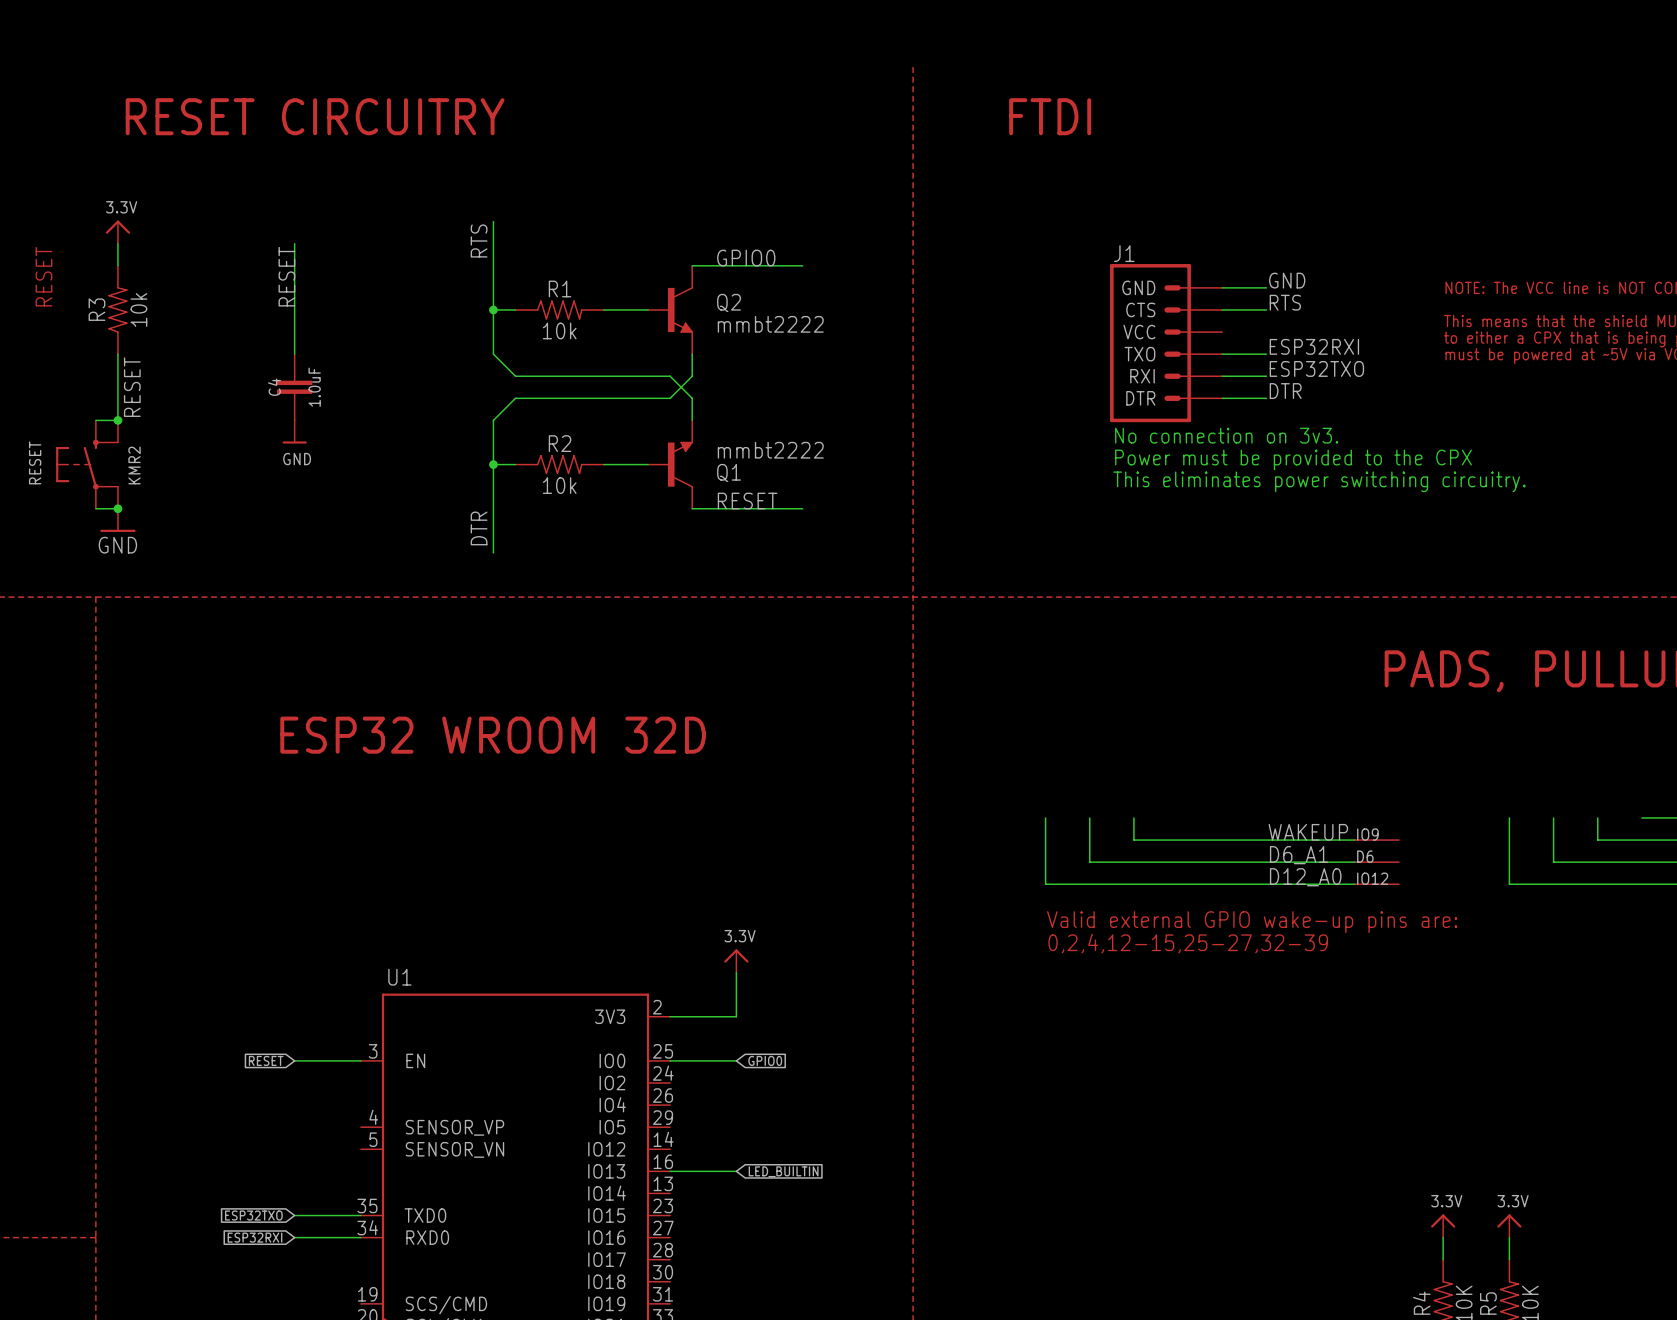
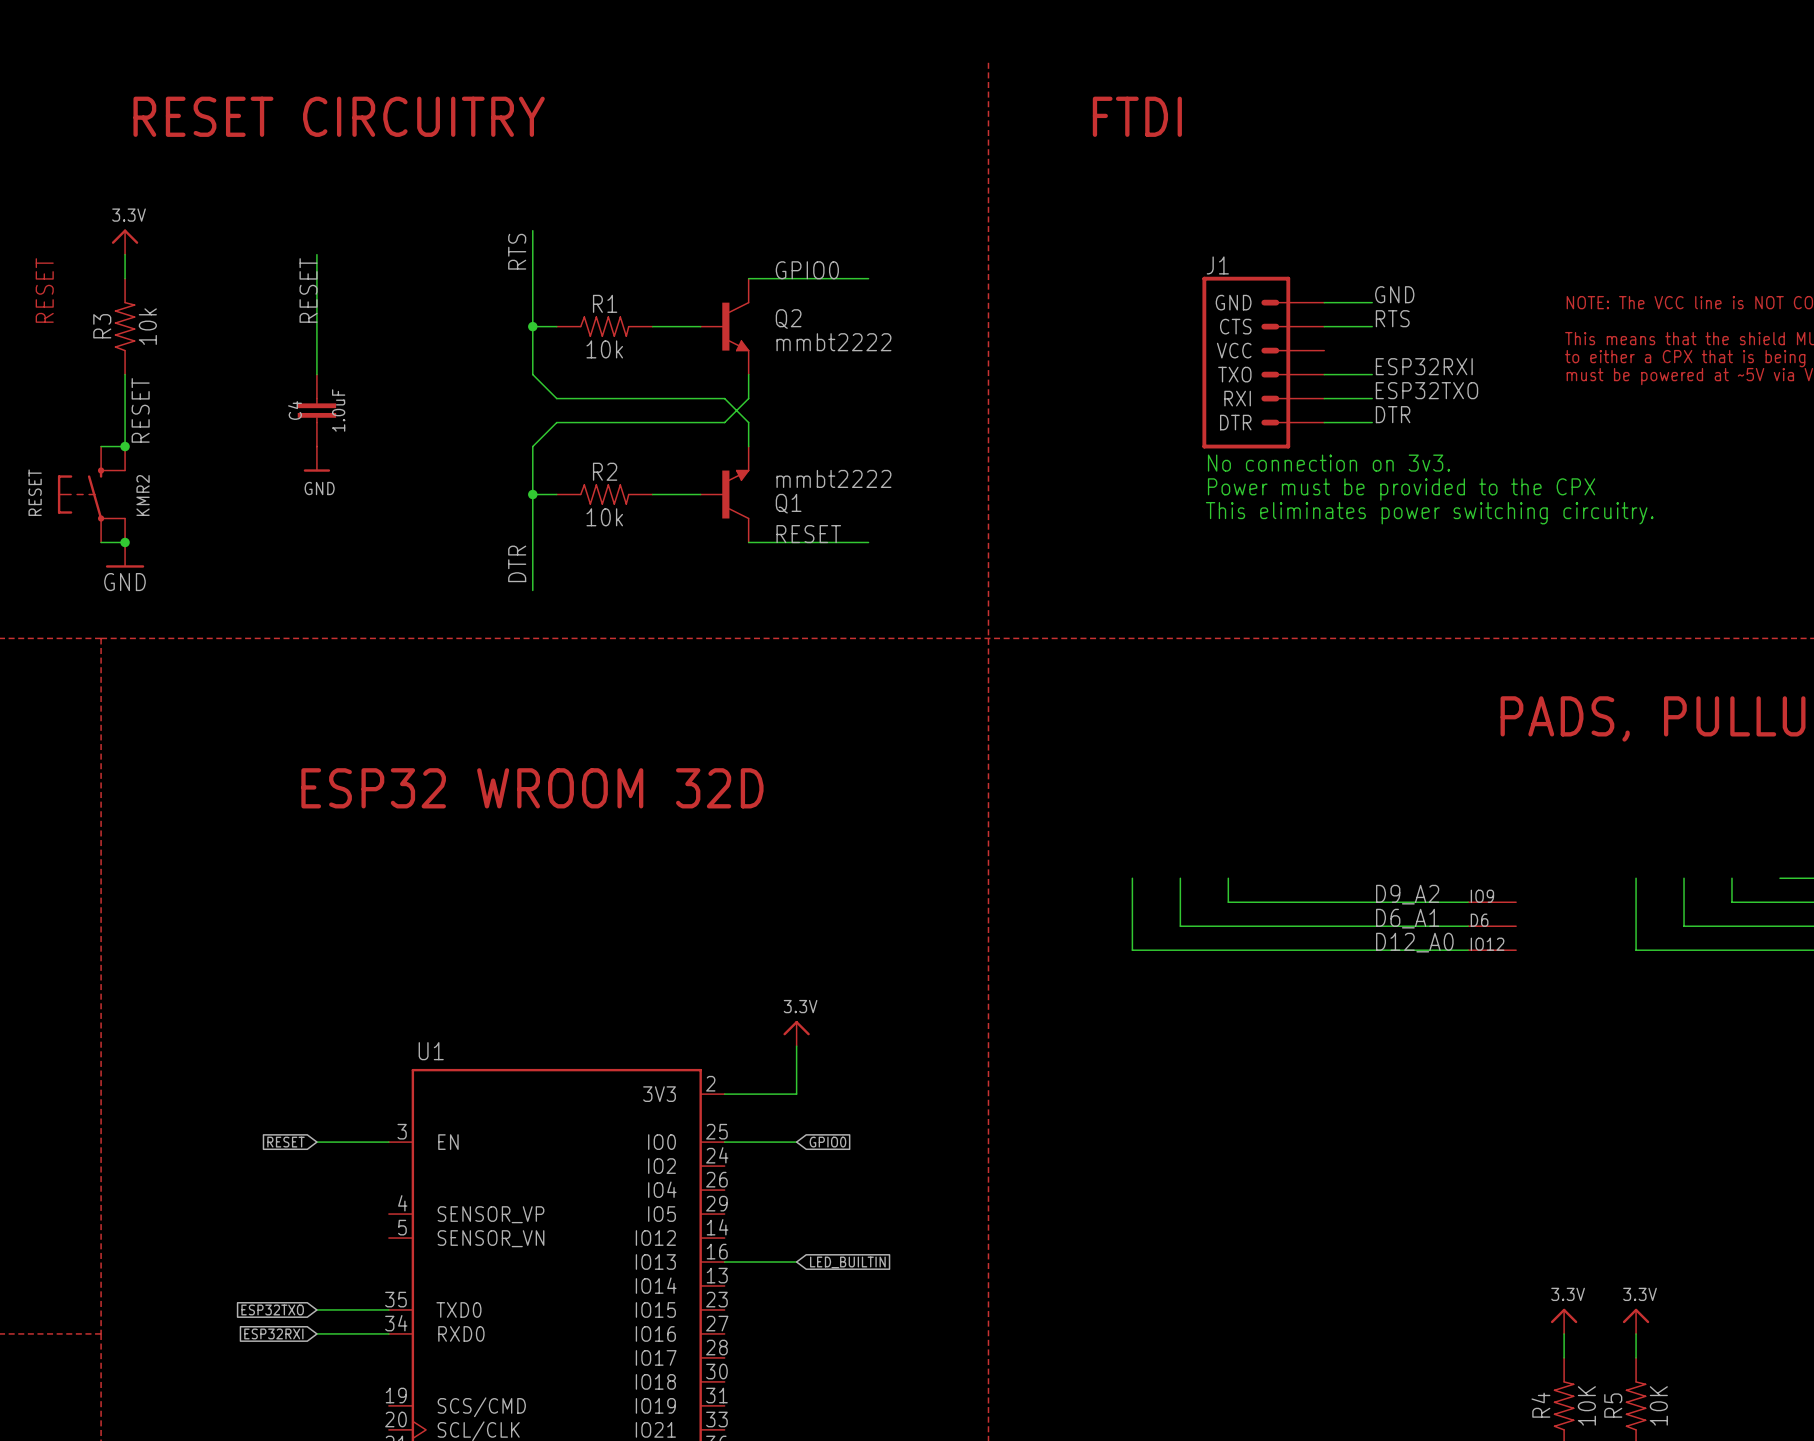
label: WAKEUP (1308, 832) -> D9_A2 (1407, 894)
text: Valid external GPIO wake-up pins are: (1252, 922) -> none
text: 0,2,4,12-15,25-27,32-39 (1188, 943) -> none

